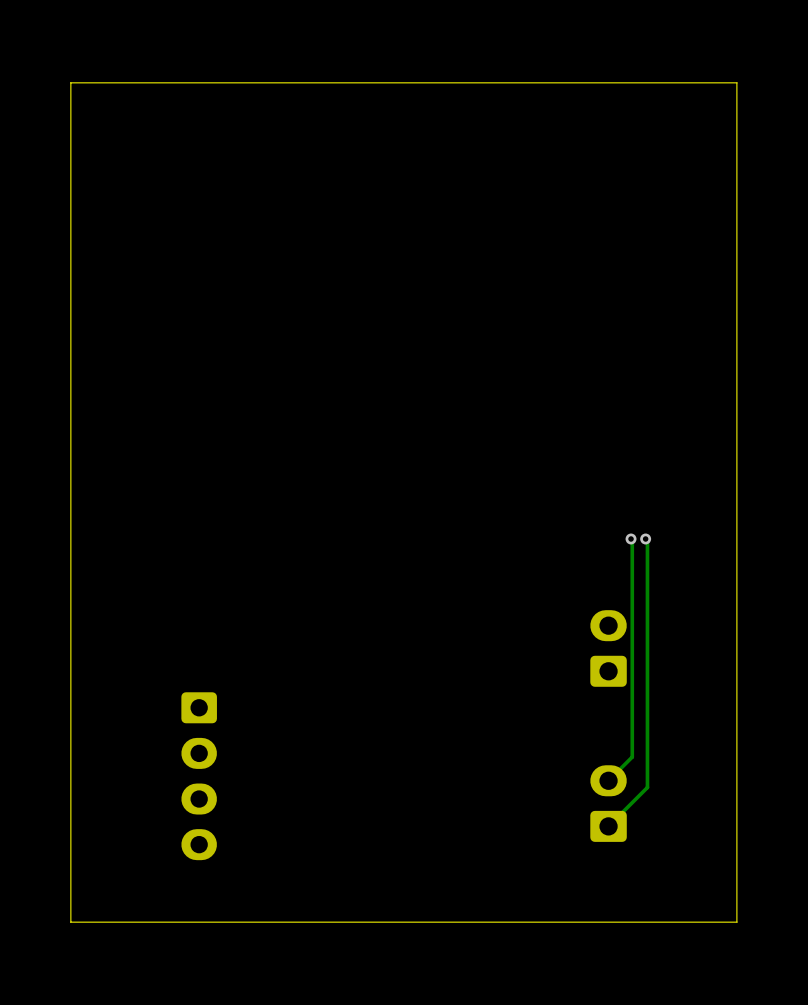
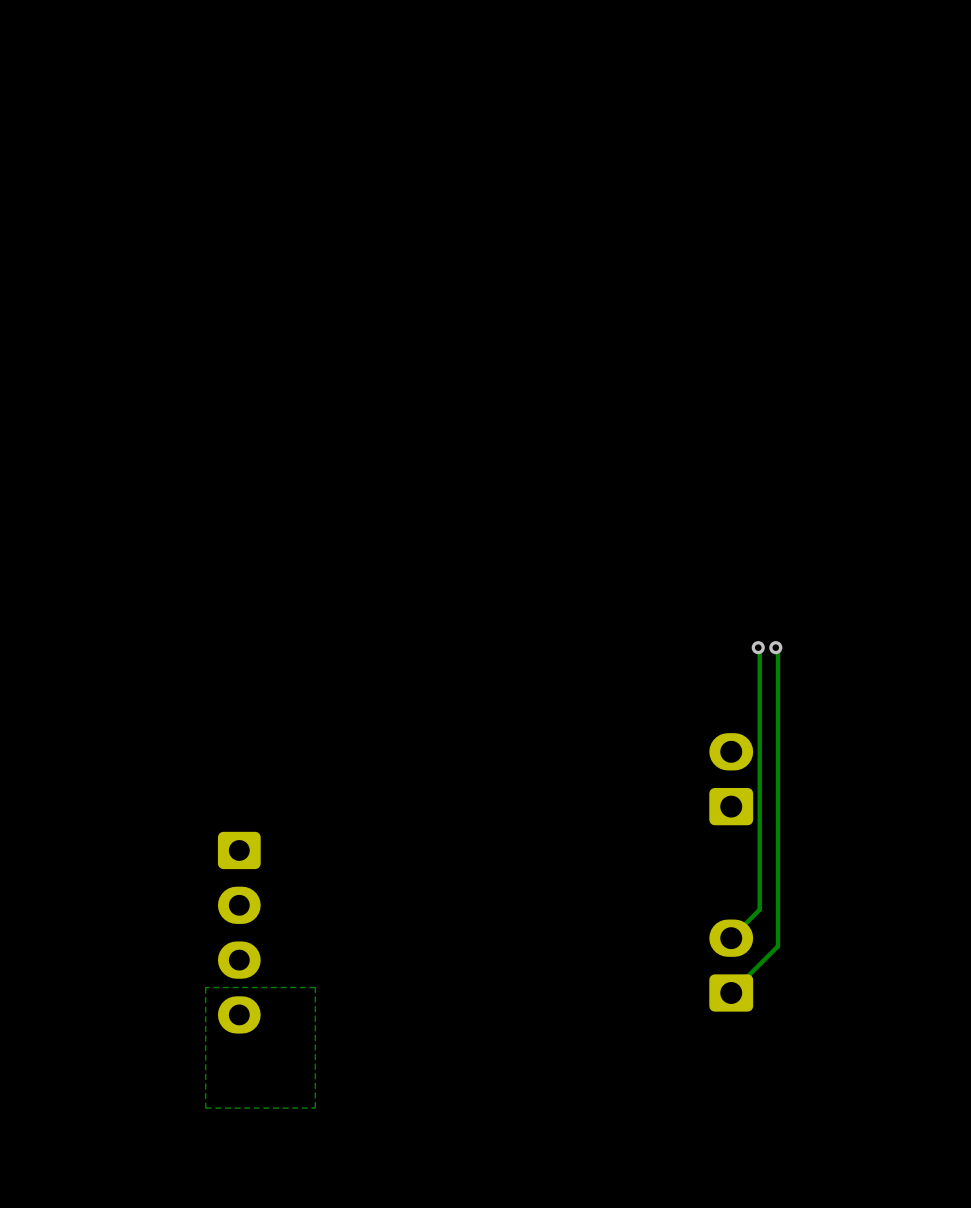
board edge: (736, 82) (70, 82) (70, 922) (736, 922) (736, 82) -> none
zone outline: none -> (315, 987) (205, 987) (205, 1108) (315, 1108) (315, 987)

